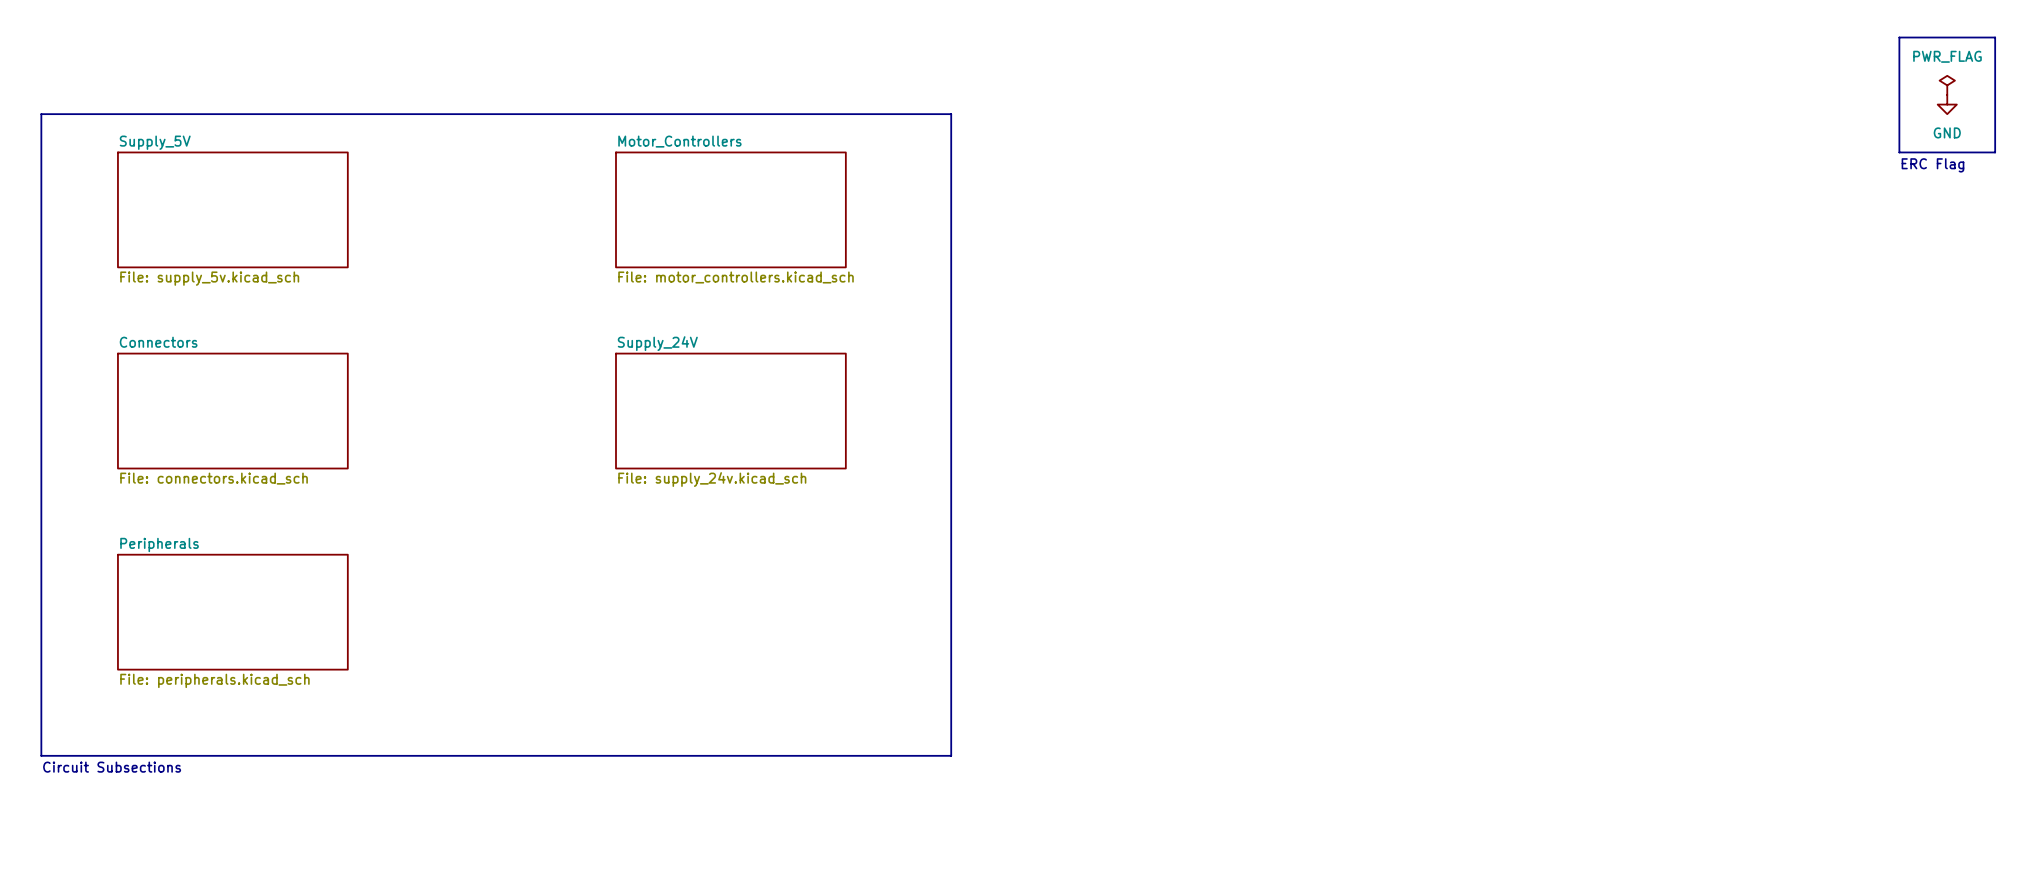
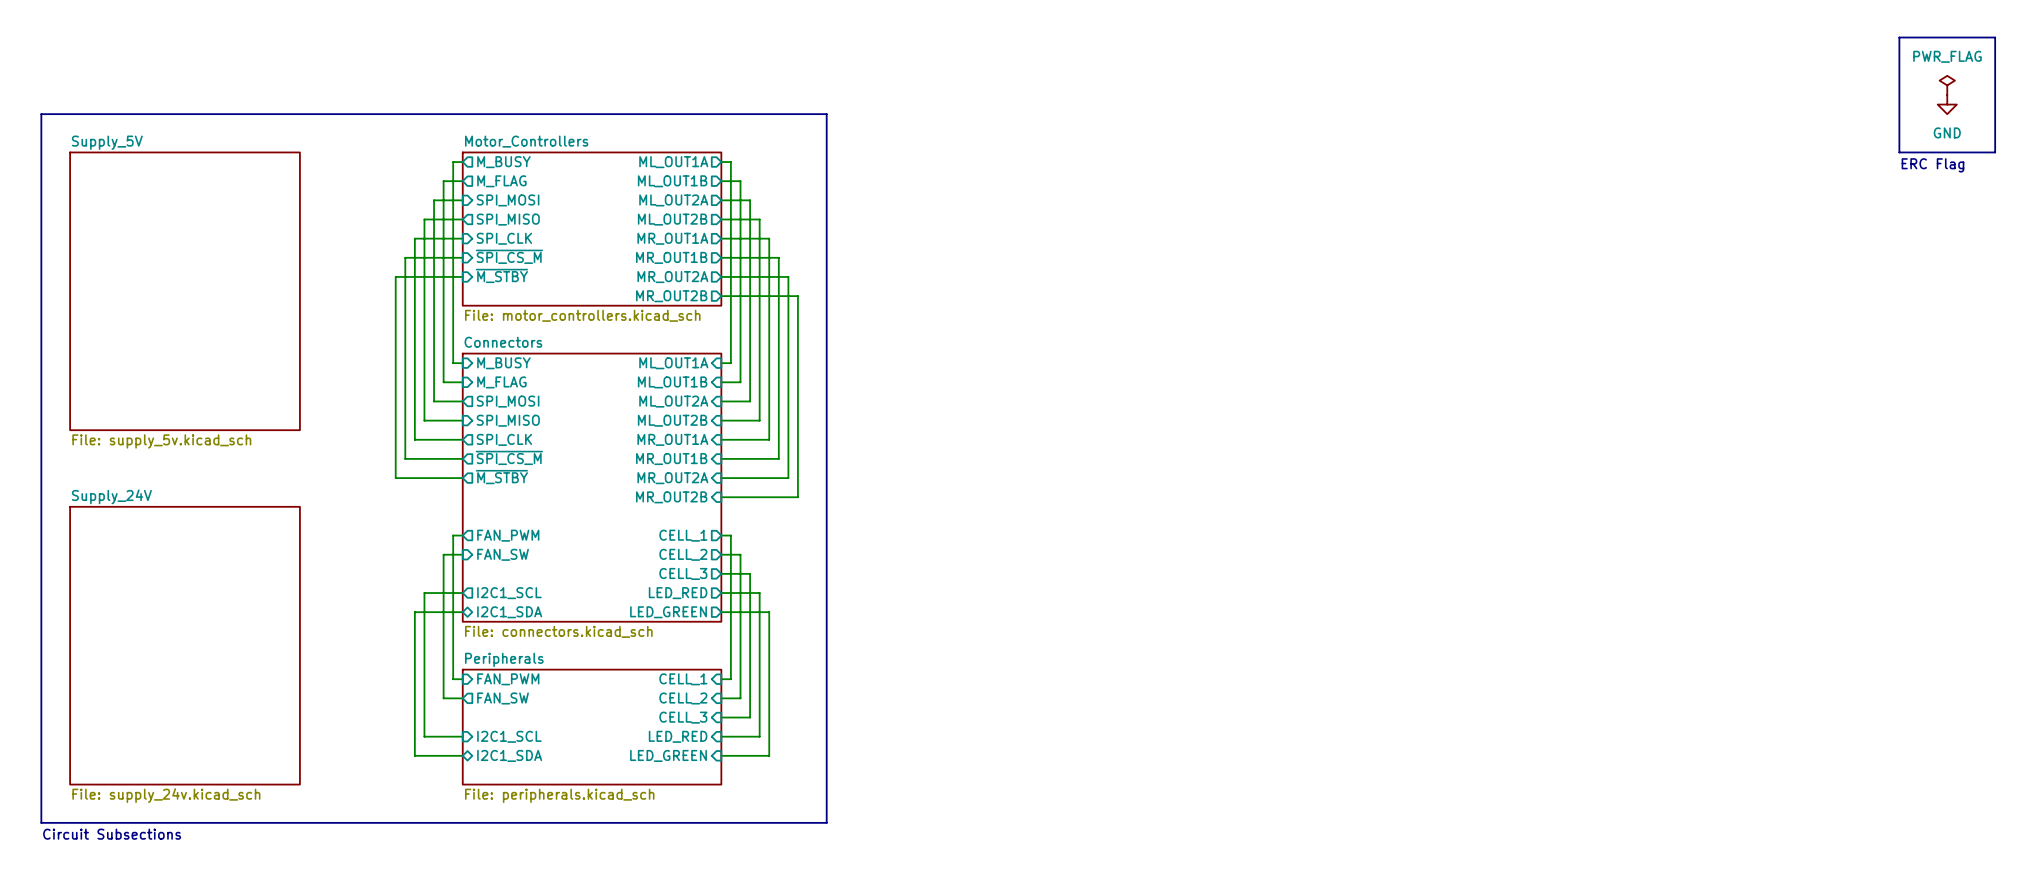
line: (826, 114) (951, 114) (951, 755) (41, 755) -> (826, 114) (826, 822) (41, 822) (41, 755)
sheet Supply_5V name position: Supply_5V (155, 142) -> Supply_5V (107, 142)
sheet Supply_5V shape: [117, 151, 349, 268] -> [69, 151, 301, 431]
wire: none -> (462, 162) (453, 162) (453, 363) (462, 363)
sheet pin: none -> M_BUSY (503, 162)
sheet pin: none -> ML_OUT1A (673, 162)
wire: none -> (721, 162) (730, 162) (730, 363) (721, 363)
wire: none -> (462, 181) (443, 181) (443, 382) (462, 382)
sheet pin: none -> M_FLAG (501, 181)
sheet pin: none -> ML_OUT1B (672, 181)
wire: none -> (721, 181) (740, 181) (740, 382) (721, 382)
wire: none -> (462, 200) (434, 200) (434, 401) (462, 401)
sheet pin: none -> SPI_MOSI (508, 200)
sheet pin: none -> ML_OUT2A (673, 200)
wire: none -> (721, 200) (750, 200) (750, 401) (721, 401)
sheet Motor_Controllers: File: motor_controllers.kicad_sch (730, 209) -> none
wire: none -> (462, 219) (424, 219) (424, 420) (462, 420)
sheet pin: none -> SPI_MISO (508, 219)
sheet pin: none -> ML_OUT2B (672, 219)
wire: none -> (721, 219) (759, 219) (759, 420) (721, 420)
sheet Motor_Controllers: none -> File: motor_controllers.kicad_sch (592, 229)
wire: none -> (462, 238) (414, 238) (414, 439) (462, 439)
sheet pin: none -> SPI_CLK (504, 238)
sheet pin: none -> MR_OUT1A (672, 238)
wire: none -> (721, 238) (769, 238) (769, 439) (721, 439)
sheet pin: none -> ~{SPI_CS_M} (509, 256)
wire: none -> (462, 257) (405, 257) (405, 458) (462, 458)
sheet pin: none -> MR_OUT1B (671, 257)
wire: none -> (721, 257) (778, 257) (778, 458) (721, 458)
sheet pin: none -> ~{M_STBY} (501, 275)
wire: none -> (462, 276) (395, 276) (395, 478) (462, 478)
wire: none -> (721, 276) (788, 276) (788, 478) (721, 478)
sheet pin: none -> MR_OUT2A (672, 277)
sheet Supply_5V value position: File: supply_5v.kicad_sch (209, 278) -> File: supply_5v.kicad_sch (161, 441)
sheet pin: none -> MR_OUT2B (671, 296)
wire: none -> (721, 296) (797, 296) (797, 497) (721, 497)
sheet Supply_24V name position: Supply_24V (657, 343) -> Supply_24V (111, 496)
sheet Supply_24V shape: [615, 353, 847, 470] -> [69, 506, 301, 786]
sheet pin: none -> M_BUSY (503, 363)
sheet pin: none -> ML_OUT1A (673, 363)
sheet pin: none -> M_FLAG (501, 382)
sheet pin: none -> ML_OUT1B (672, 382)
sheet pin: none -> SPI_MOSI (508, 401)
sheet pin: none -> ML_OUT2A (673, 401)
sheet Connectors: File: connectors.kicad_sch (232, 411) -> none
sheet pin: none -> SPI_MISO (508, 420)
sheet pin: none -> ML_OUT2B (672, 420)
sheet pin: none -> SPI_CLK (504, 439)
sheet pin: none -> MR_OUT1A (672, 439)
sheet pin: none -> ~{SPI_CS_M} (509, 457)
sheet pin: none -> MR_OUT1B (671, 459)
sheet pin: none -> ~{M_STBY} (501, 477)
sheet pin: none -> MR_OUT2A (672, 478)
sheet Supply_24V value position: File: supply_24v.kicad_sch (712, 479) -> File: supply_24v.kicad_sch (166, 795)
sheet Connectors: none -> File: connectors.kicad_sch (592, 487)
sheet pin: none -> MR_OUT2B (671, 497)
wire: none -> (462, 535) (453, 535) (453, 679) (462, 679)
sheet pin: none -> FAN_PWM (508, 535)
sheet pin: none -> CELL_1 (683, 535)
wire: none -> (721, 535) (730, 535) (730, 679) (721, 679)
wire: none -> (462, 554) (443, 554) (443, 698) (462, 698)
sheet pin: none -> FAN_SW (503, 554)
sheet pin: none -> CELL_2 (683, 554)
wire: none -> (721, 554) (740, 554) (740, 698) (721, 698)
sheet pin: none -> CELL_3 (683, 573)
wire: none -> (721, 573) (750, 573) (750, 717) (721, 717)
wire: none -> (462, 593) (424, 593) (424, 736) (462, 736)
sheet pin: none -> I2C1_SCL (509, 593)
sheet pin: none -> LED_RED (678, 593)
wire: none -> (721, 593) (759, 593) (759, 736) (721, 736)
sheet Peripherals: File: peripherals.kicad_sch (232, 612) -> none
wire: none -> (462, 612) (414, 612) (414, 755) (462, 755)
sheet pin: none -> I2C1_SDA (509, 612)
sheet pin: none -> LED_GREEN (668, 612)
wire: none -> (721, 612) (769, 612) (769, 755) (721, 755)
sheet pin: none -> FAN_PWM (508, 679)
sheet pin: none -> CELL_1 (683, 679)
sheet pin: none -> FAN_SW (503, 698)
sheet pin: none -> CELL_2 (683, 698)
sheet pin: none -> CELL_3 (683, 717)
sheet Peripherals: none -> File: peripherals.kicad_sch (592, 727)
sheet pin: none -> I2C1_SCL (509, 736)
sheet pin: none -> LED_RED (678, 736)
sheet pin: none -> I2C1_SDA (509, 755)
sheet pin: none -> LED_GREEN (668, 755)
text position: Circuit Subsections (112, 767) -> Circuit Subsections (112, 834)

